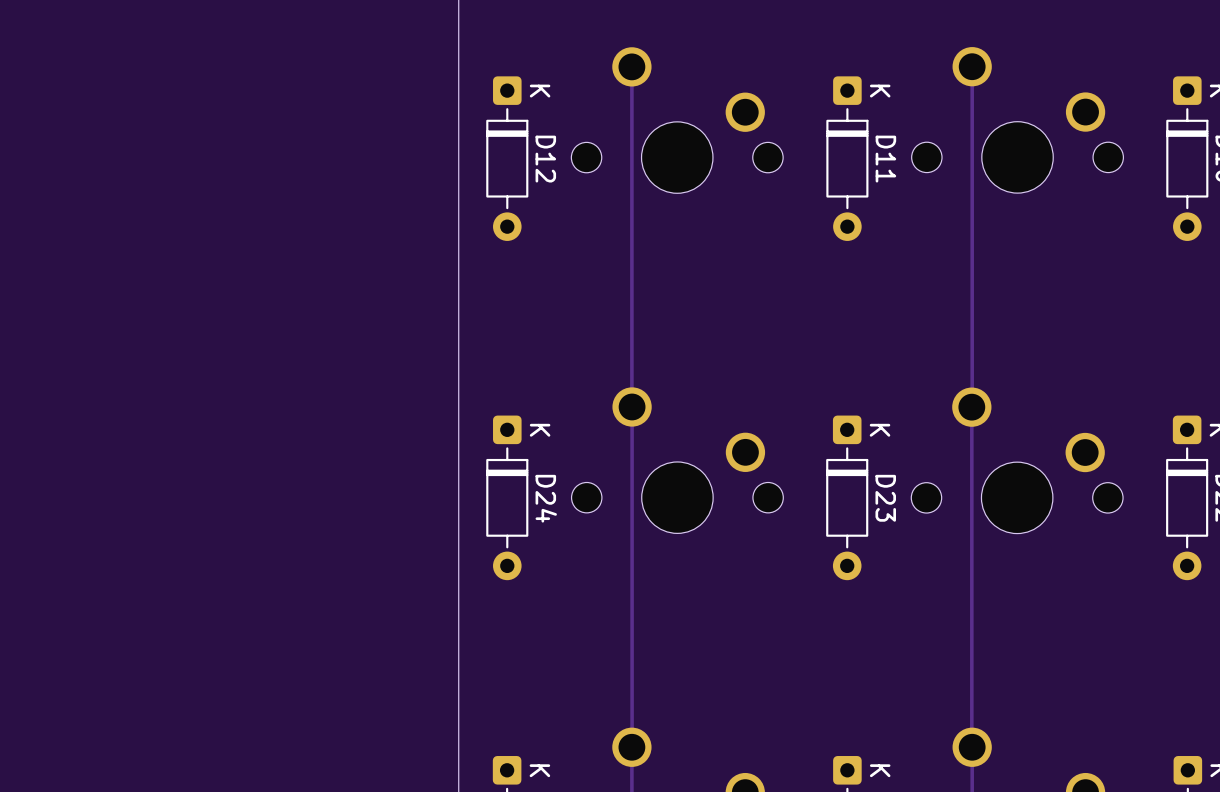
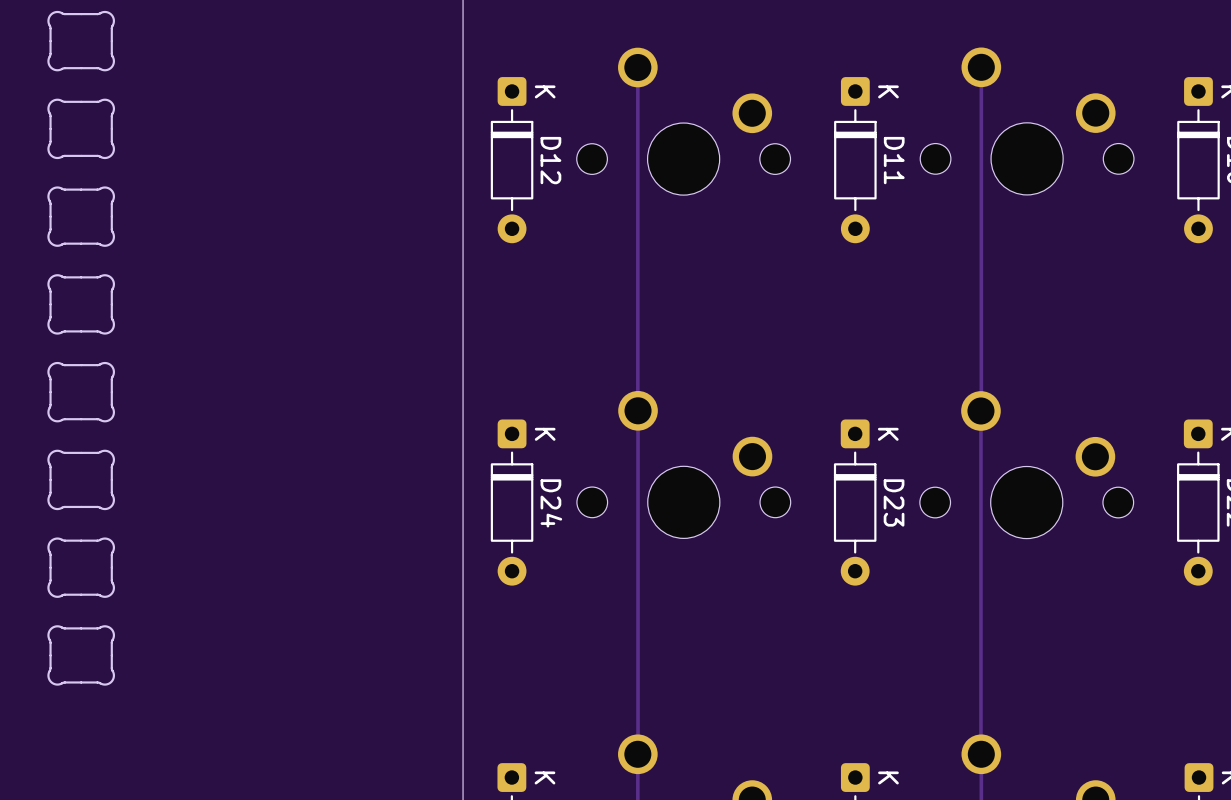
part: none -> (81, 41)
part: none -> (81, 128)
part: none -> (81, 216)
part: none -> (81, 304)
part: none -> (81, 392)
part: none -> (81, 479)
part: none -> (81, 567)
part: none -> (81, 655)

